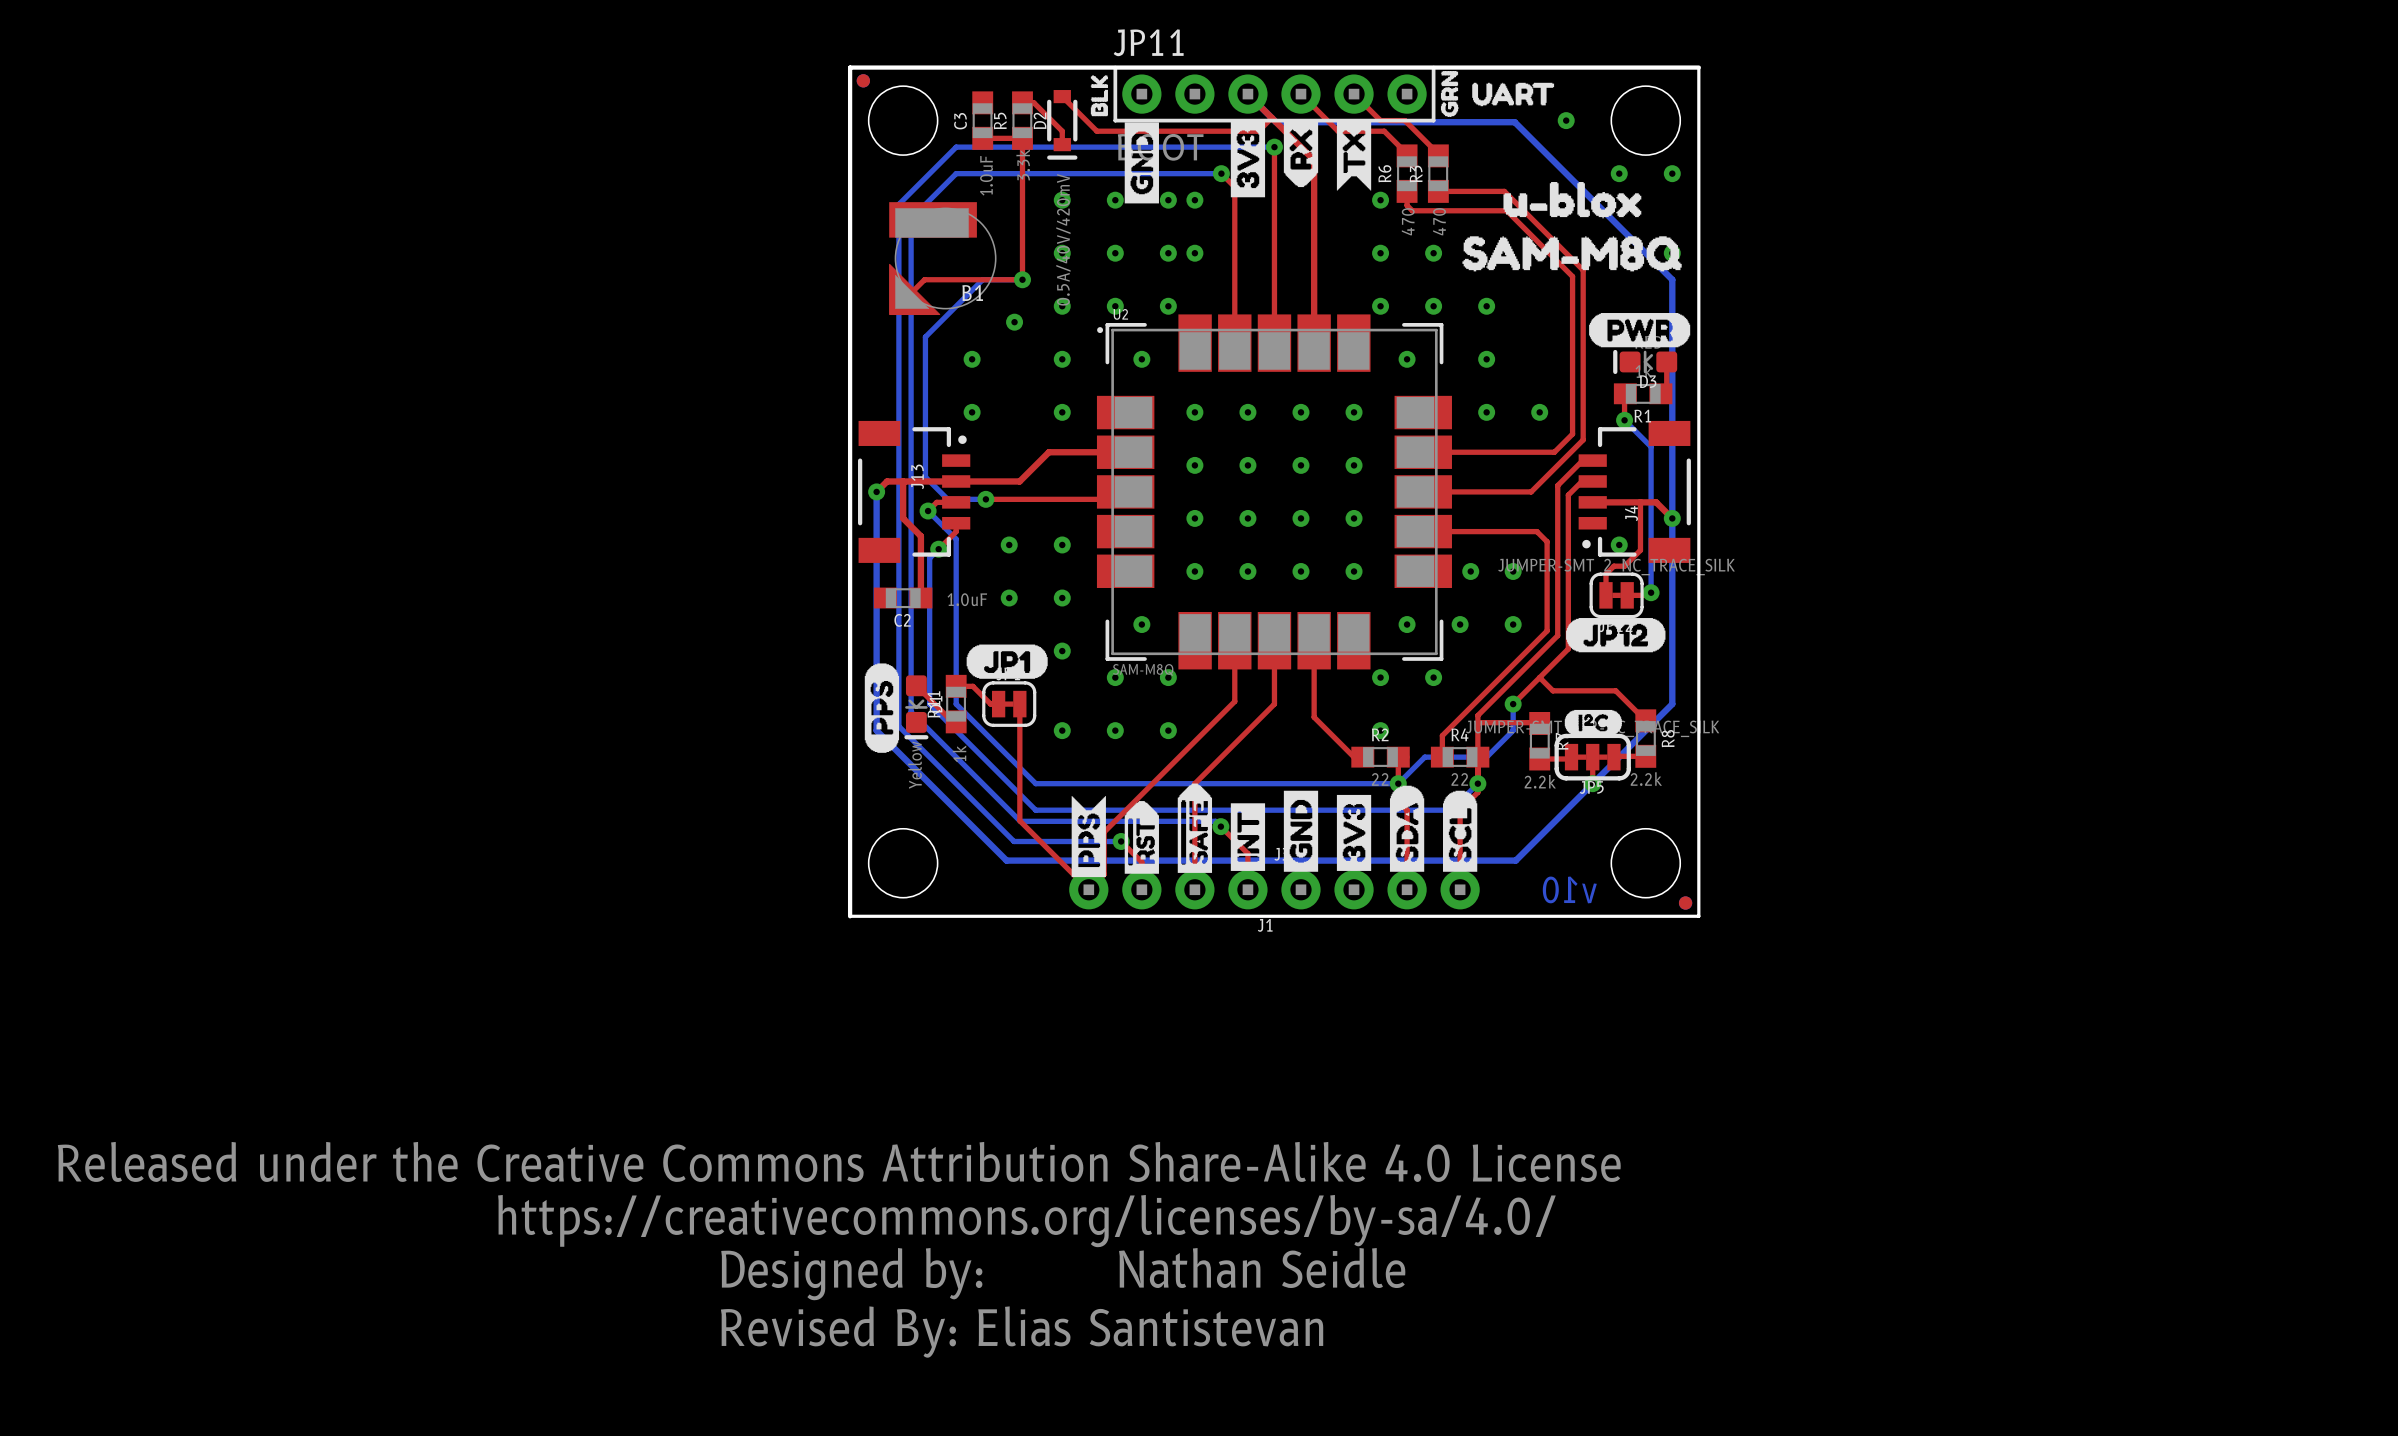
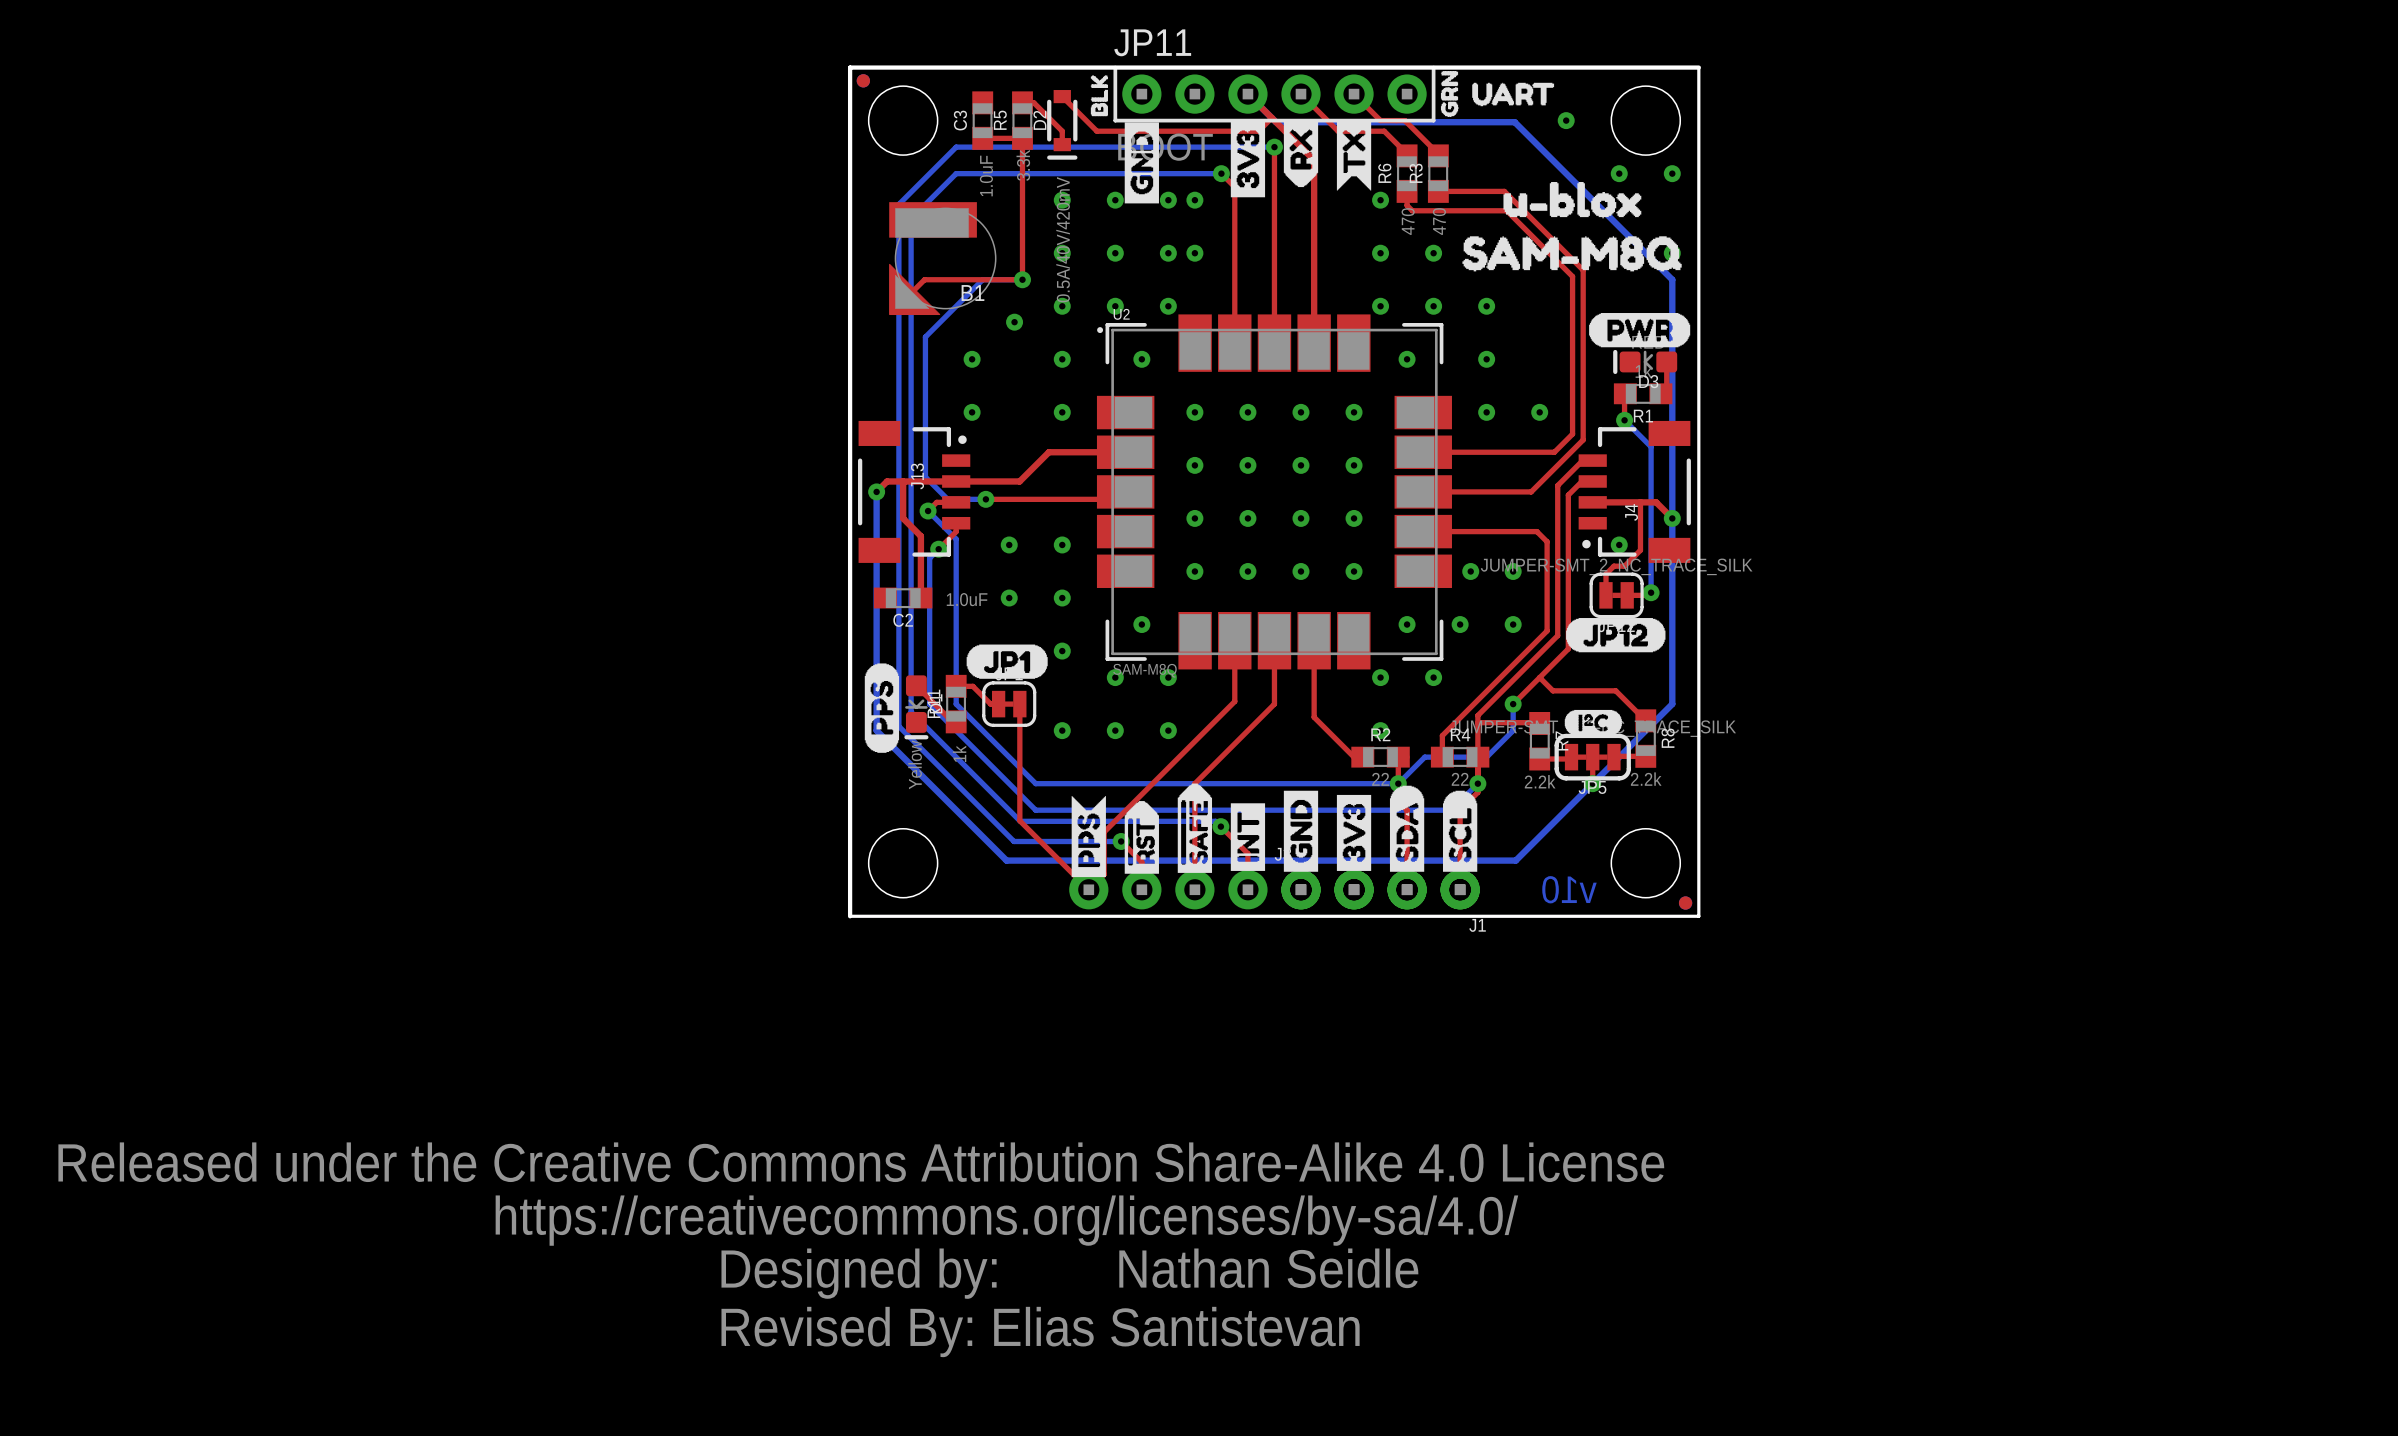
J1 footprint: [1069, 870, 1268, 910] -> [1069, 870, 1480, 910]
J1 name position: J1 (1265, 925) -> J1 (1477, 925)

